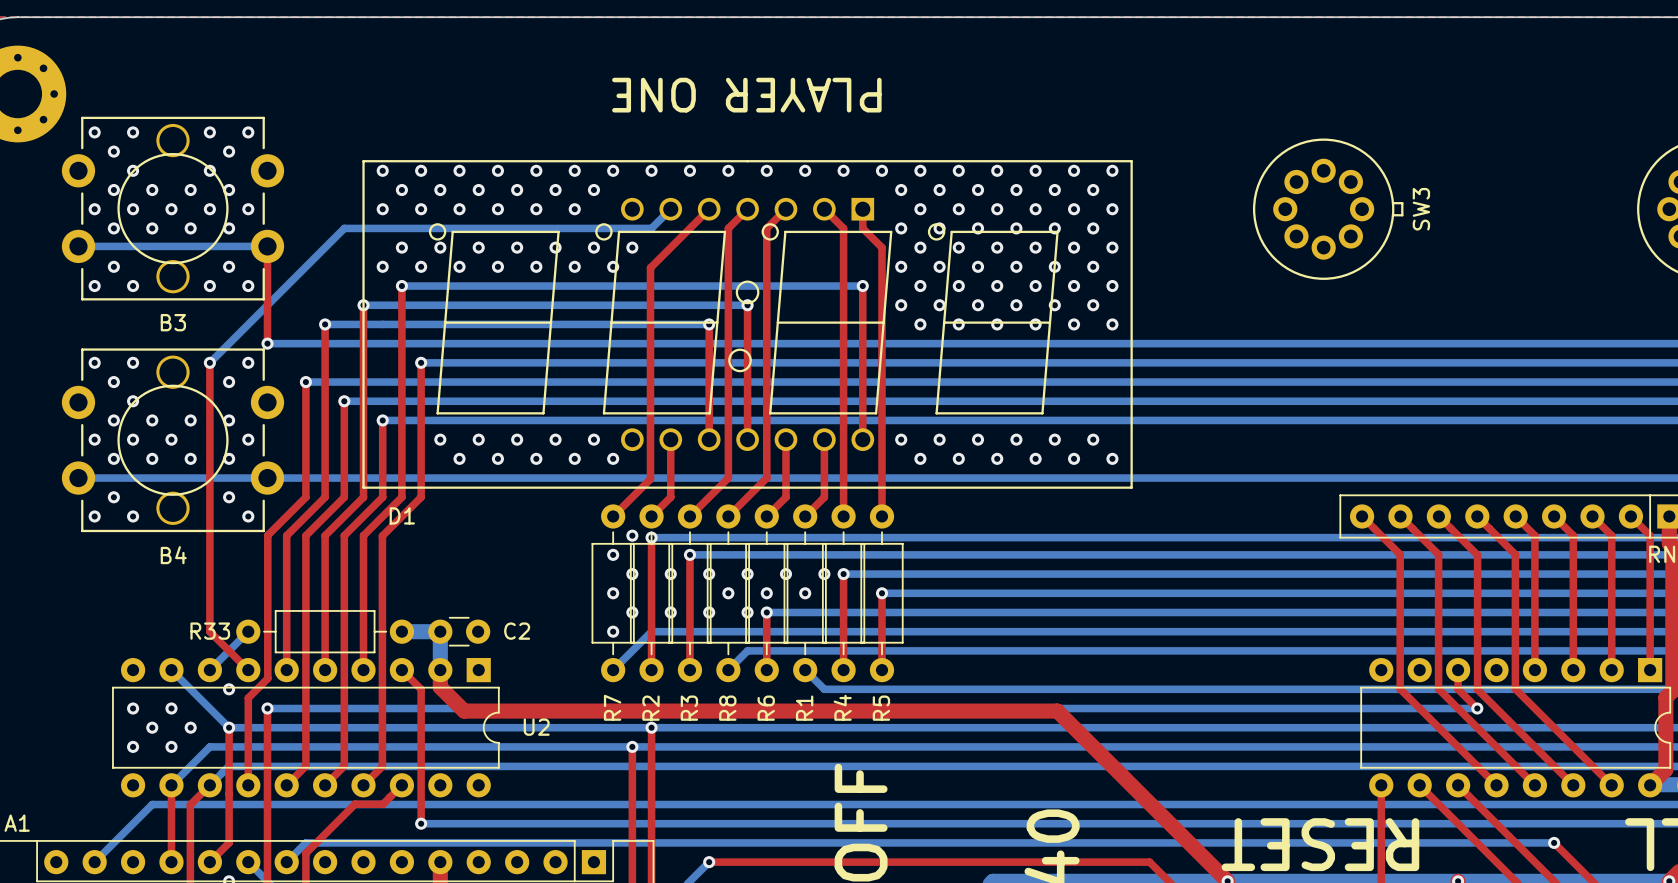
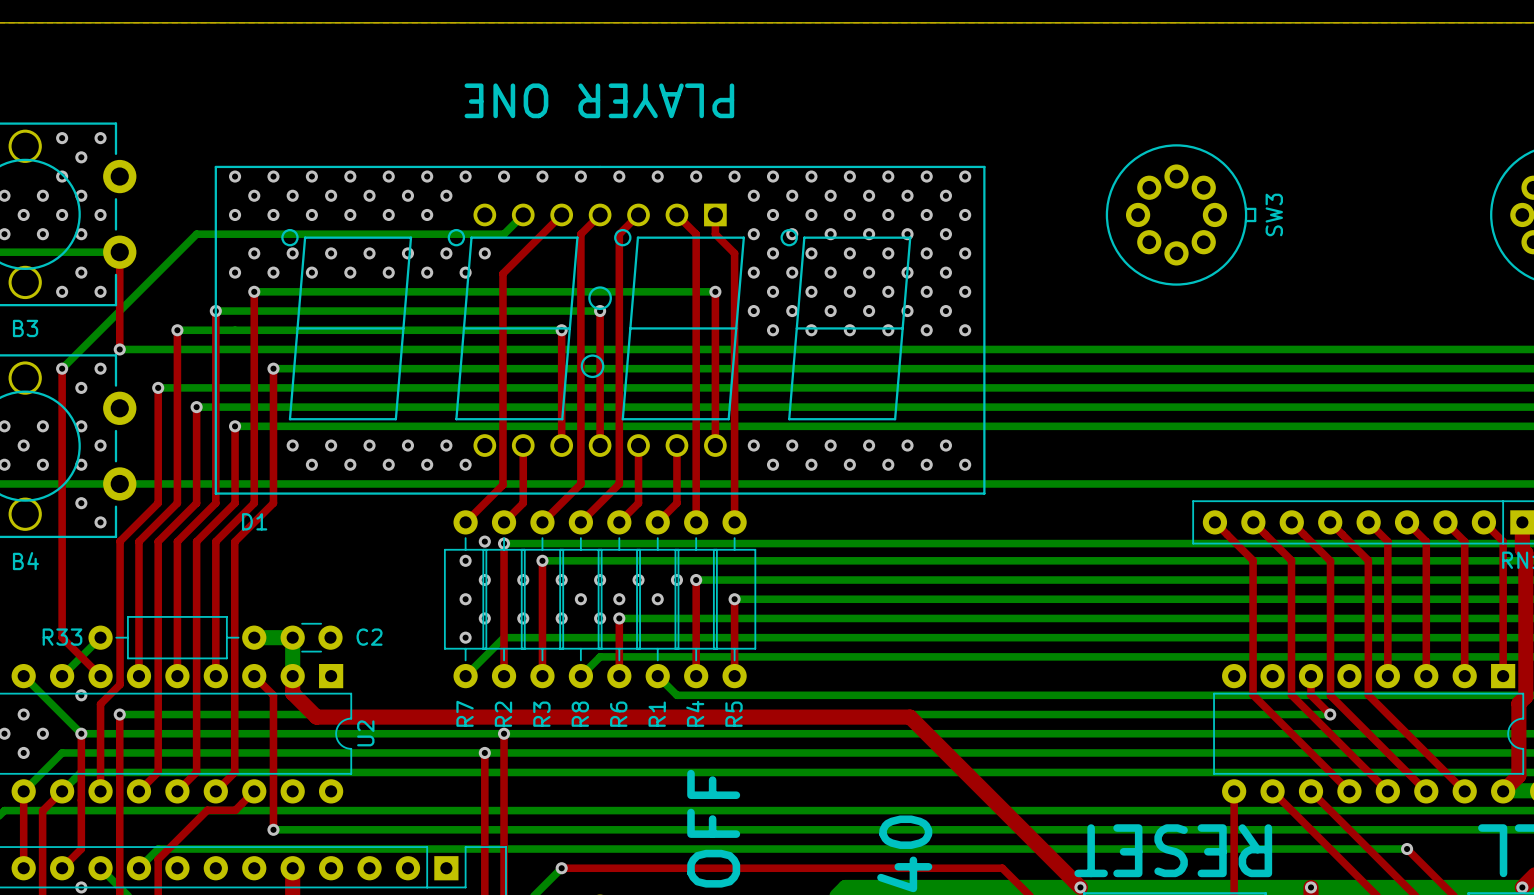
U2 name rotation: 0° (536, 727) -> 90° counterclockwise (365, 733)

